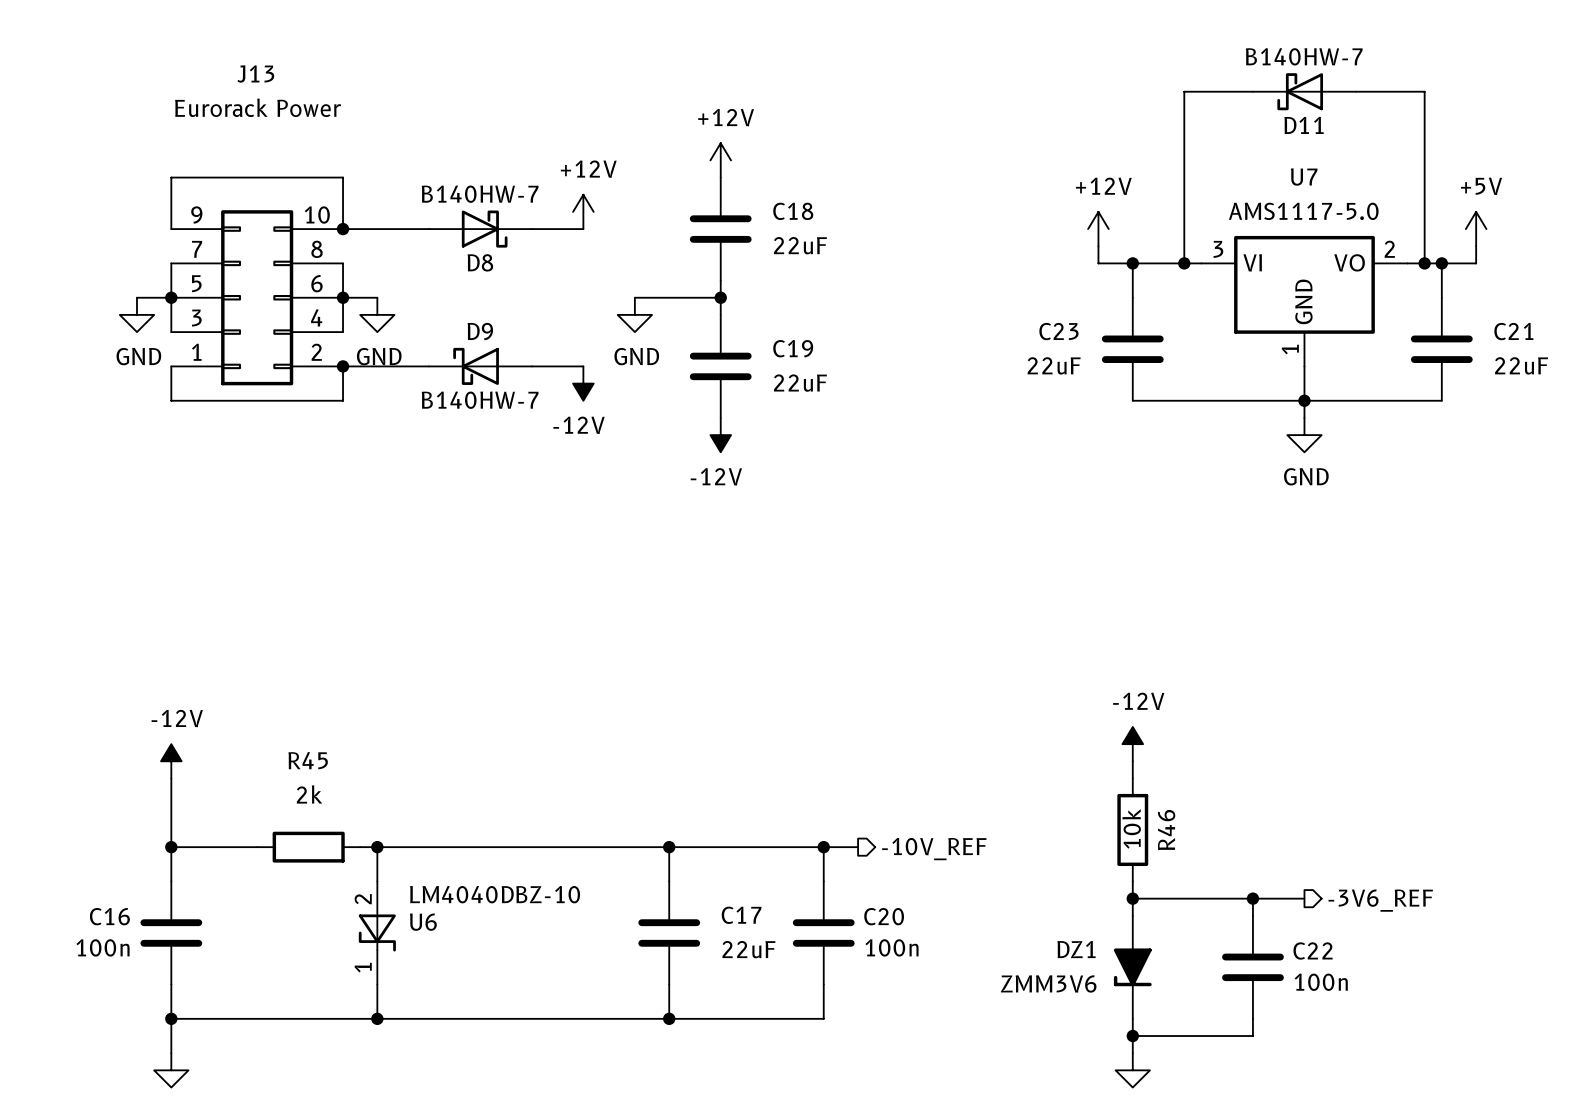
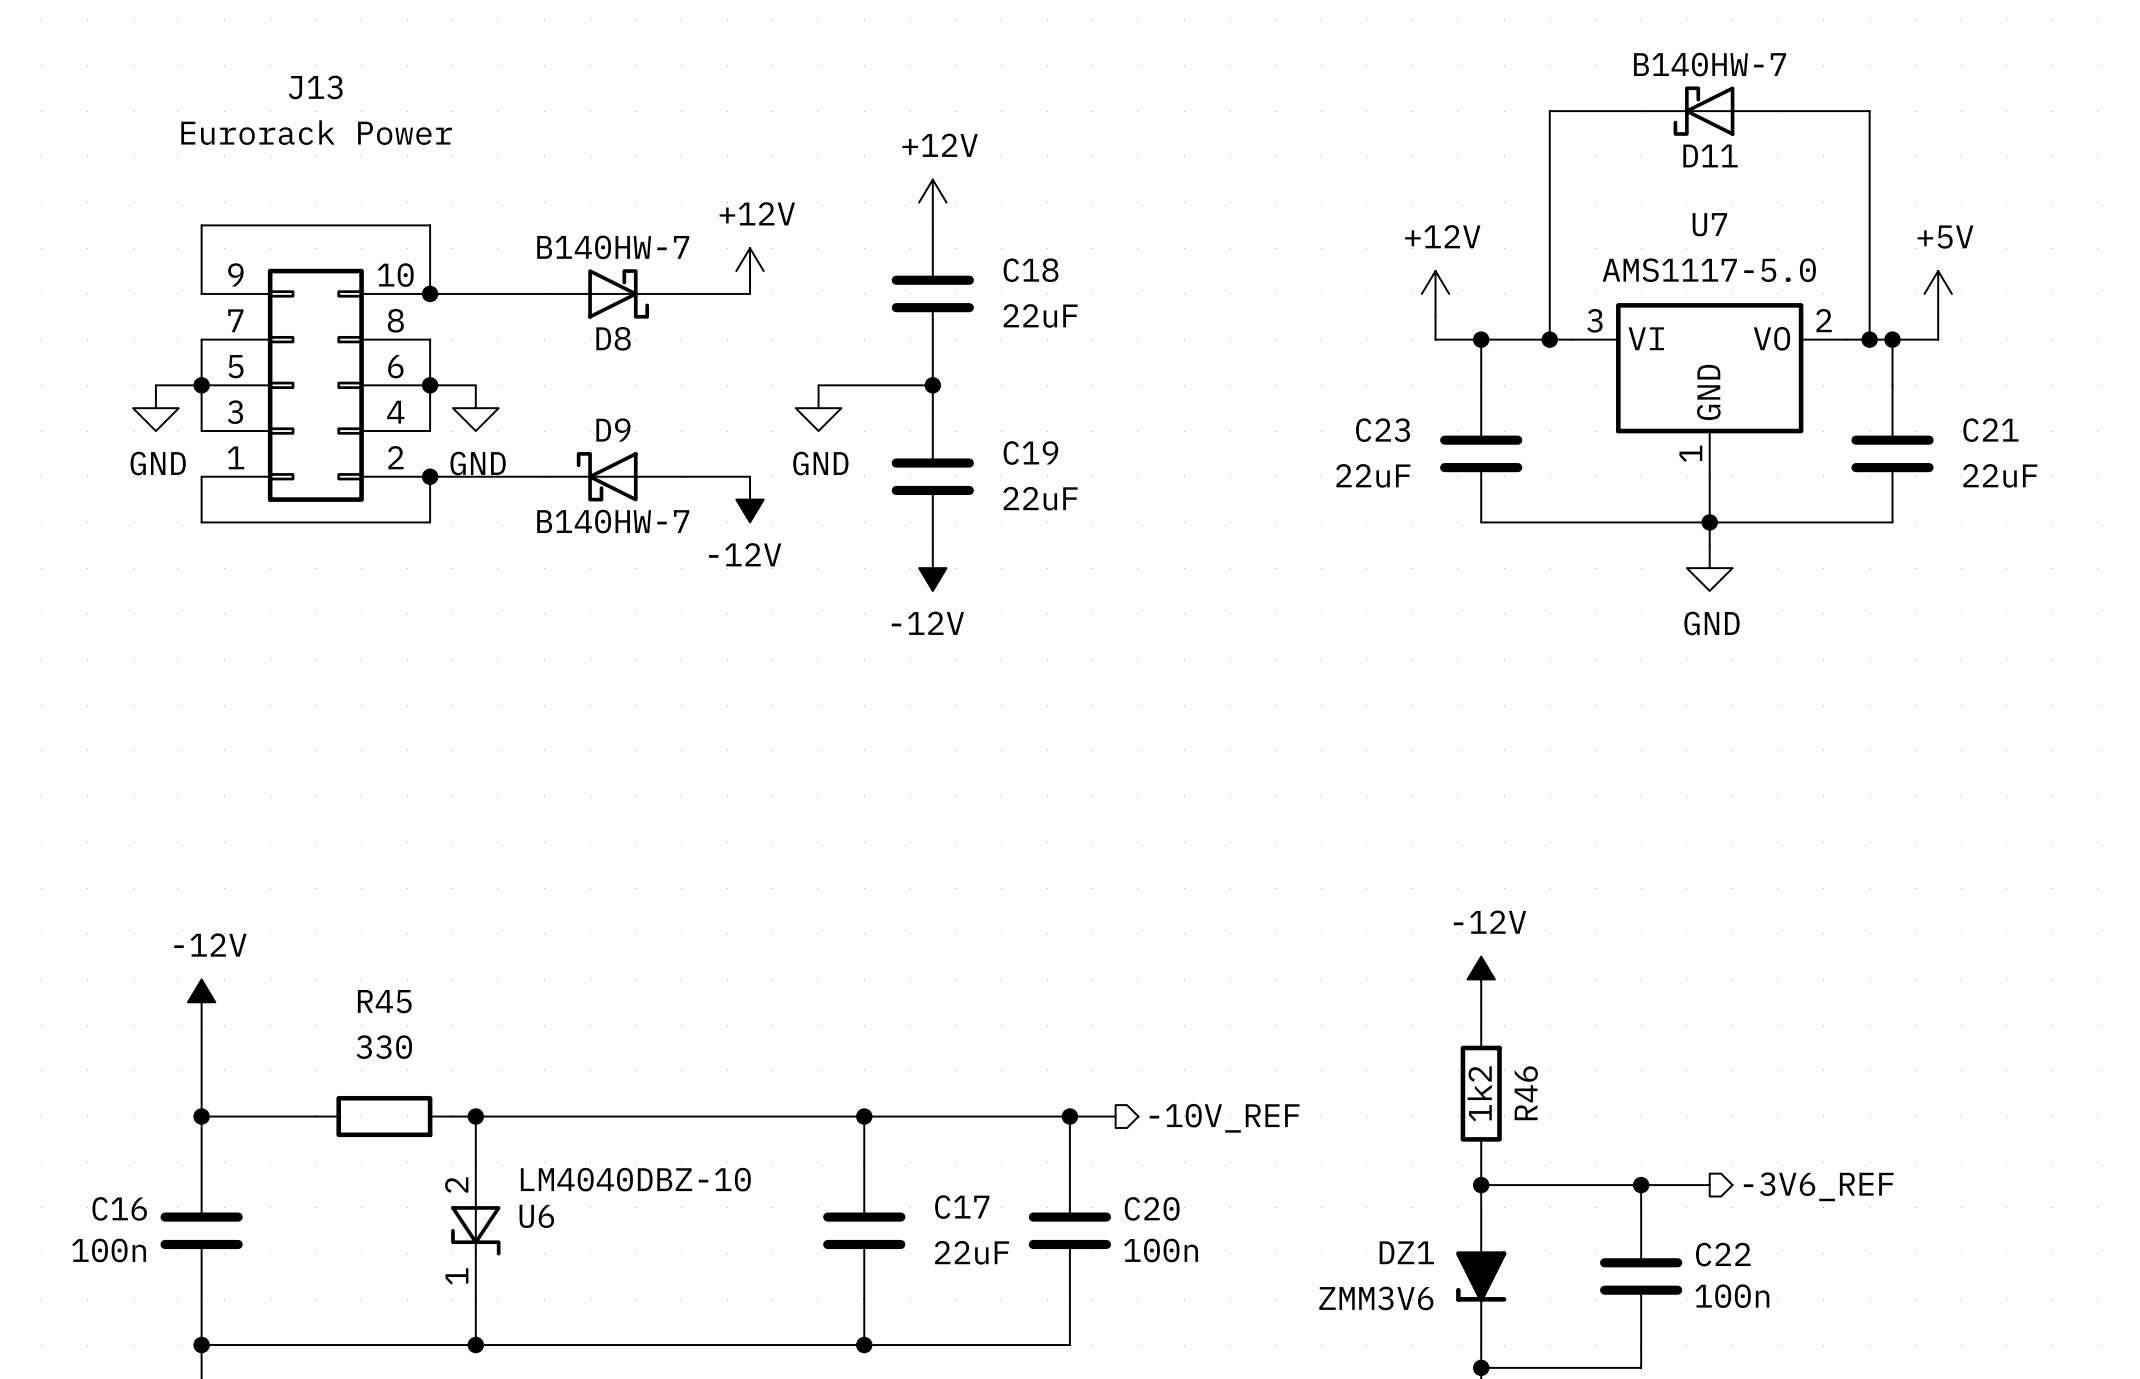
R45 value: 2k (309, 794) -> 330 (384, 1047)
R46 value: 10k (1131, 828) -> 1k2 (1479, 1093)

